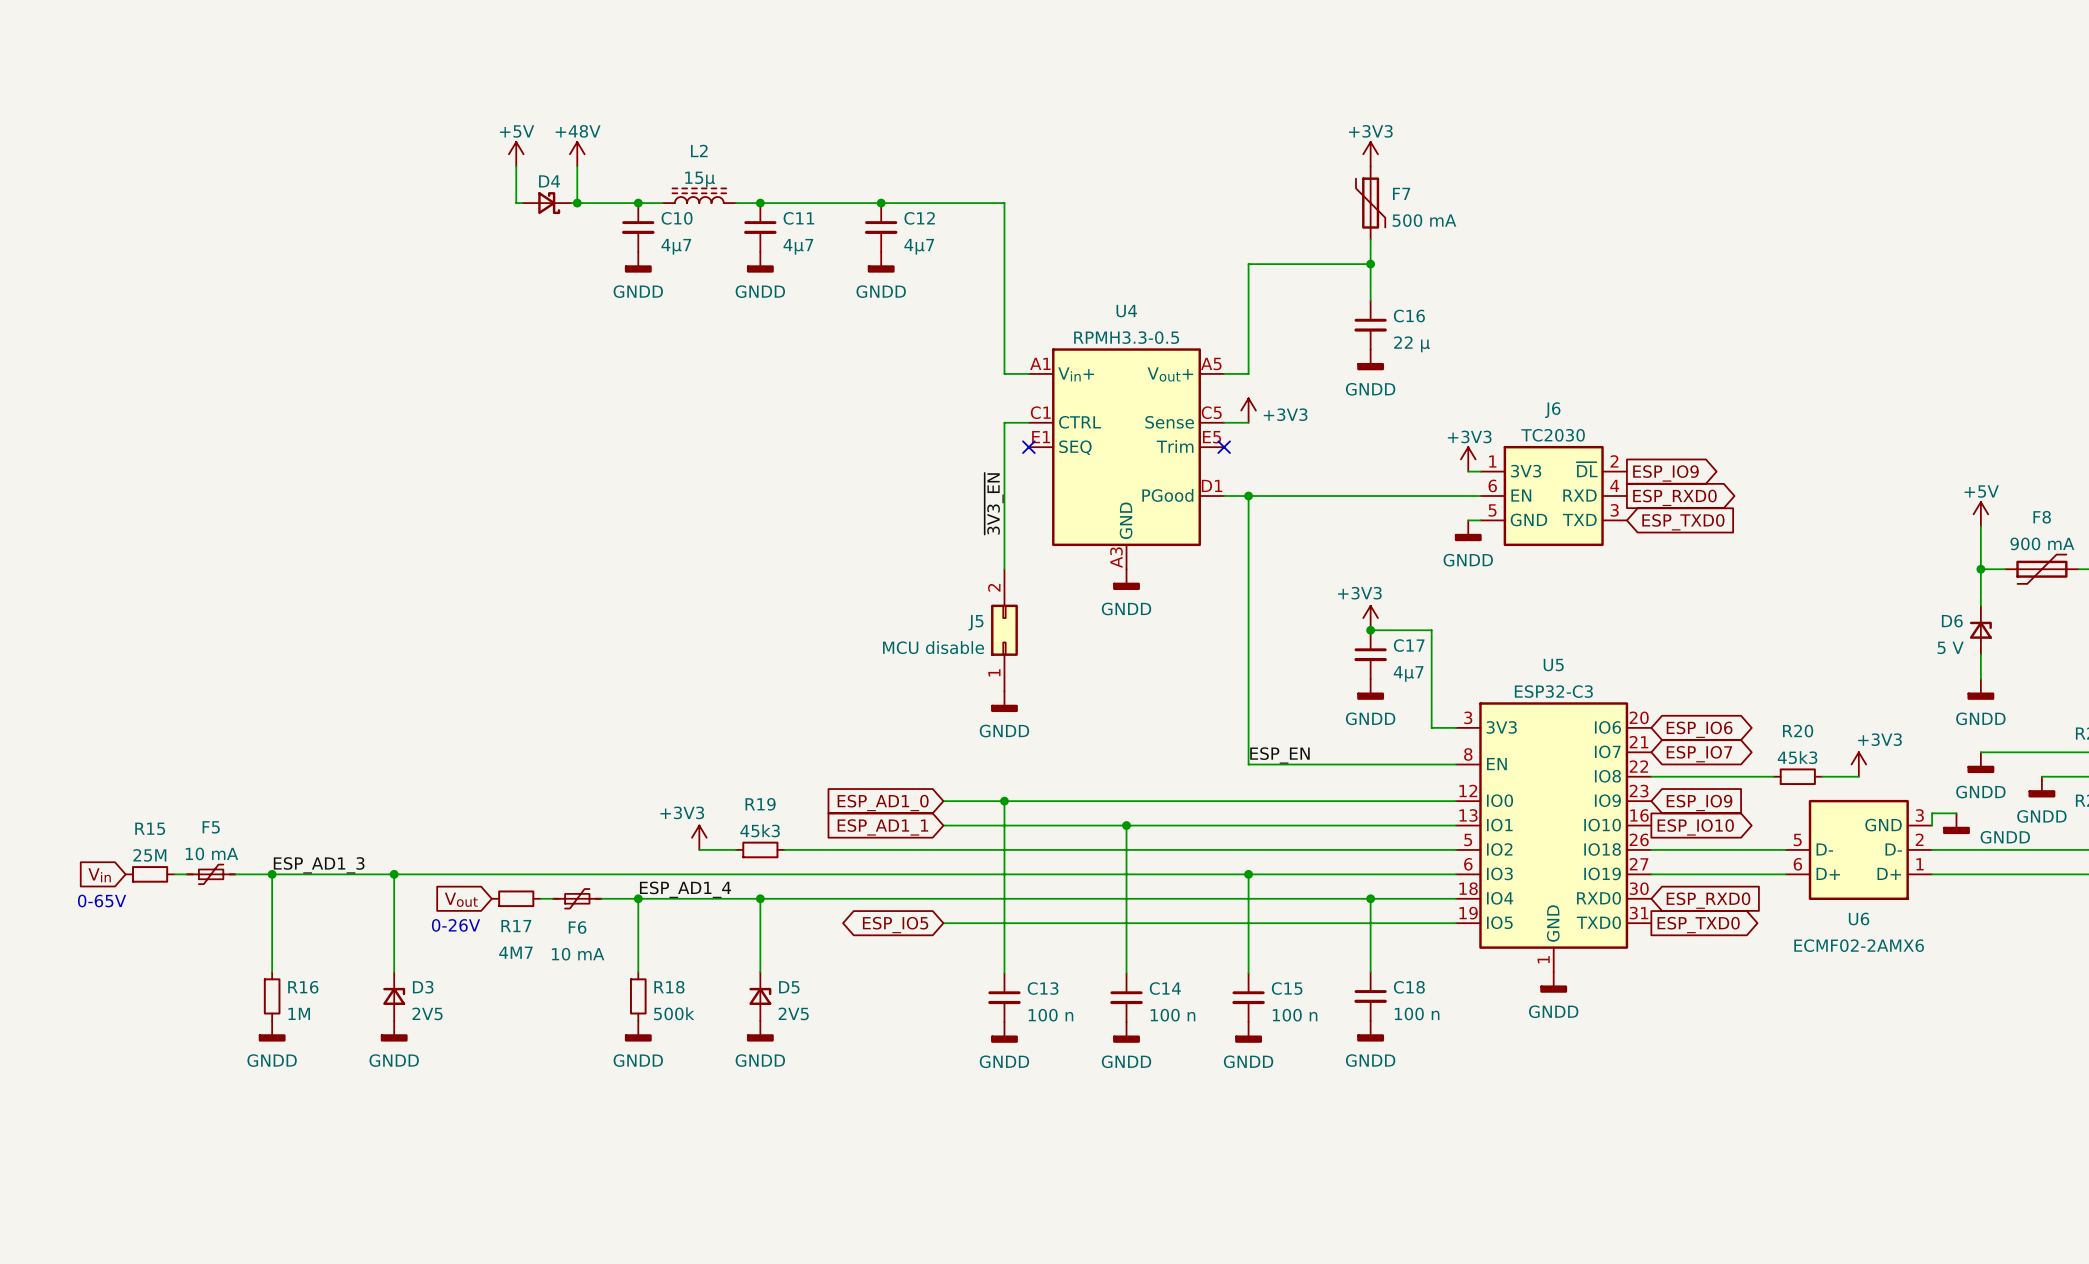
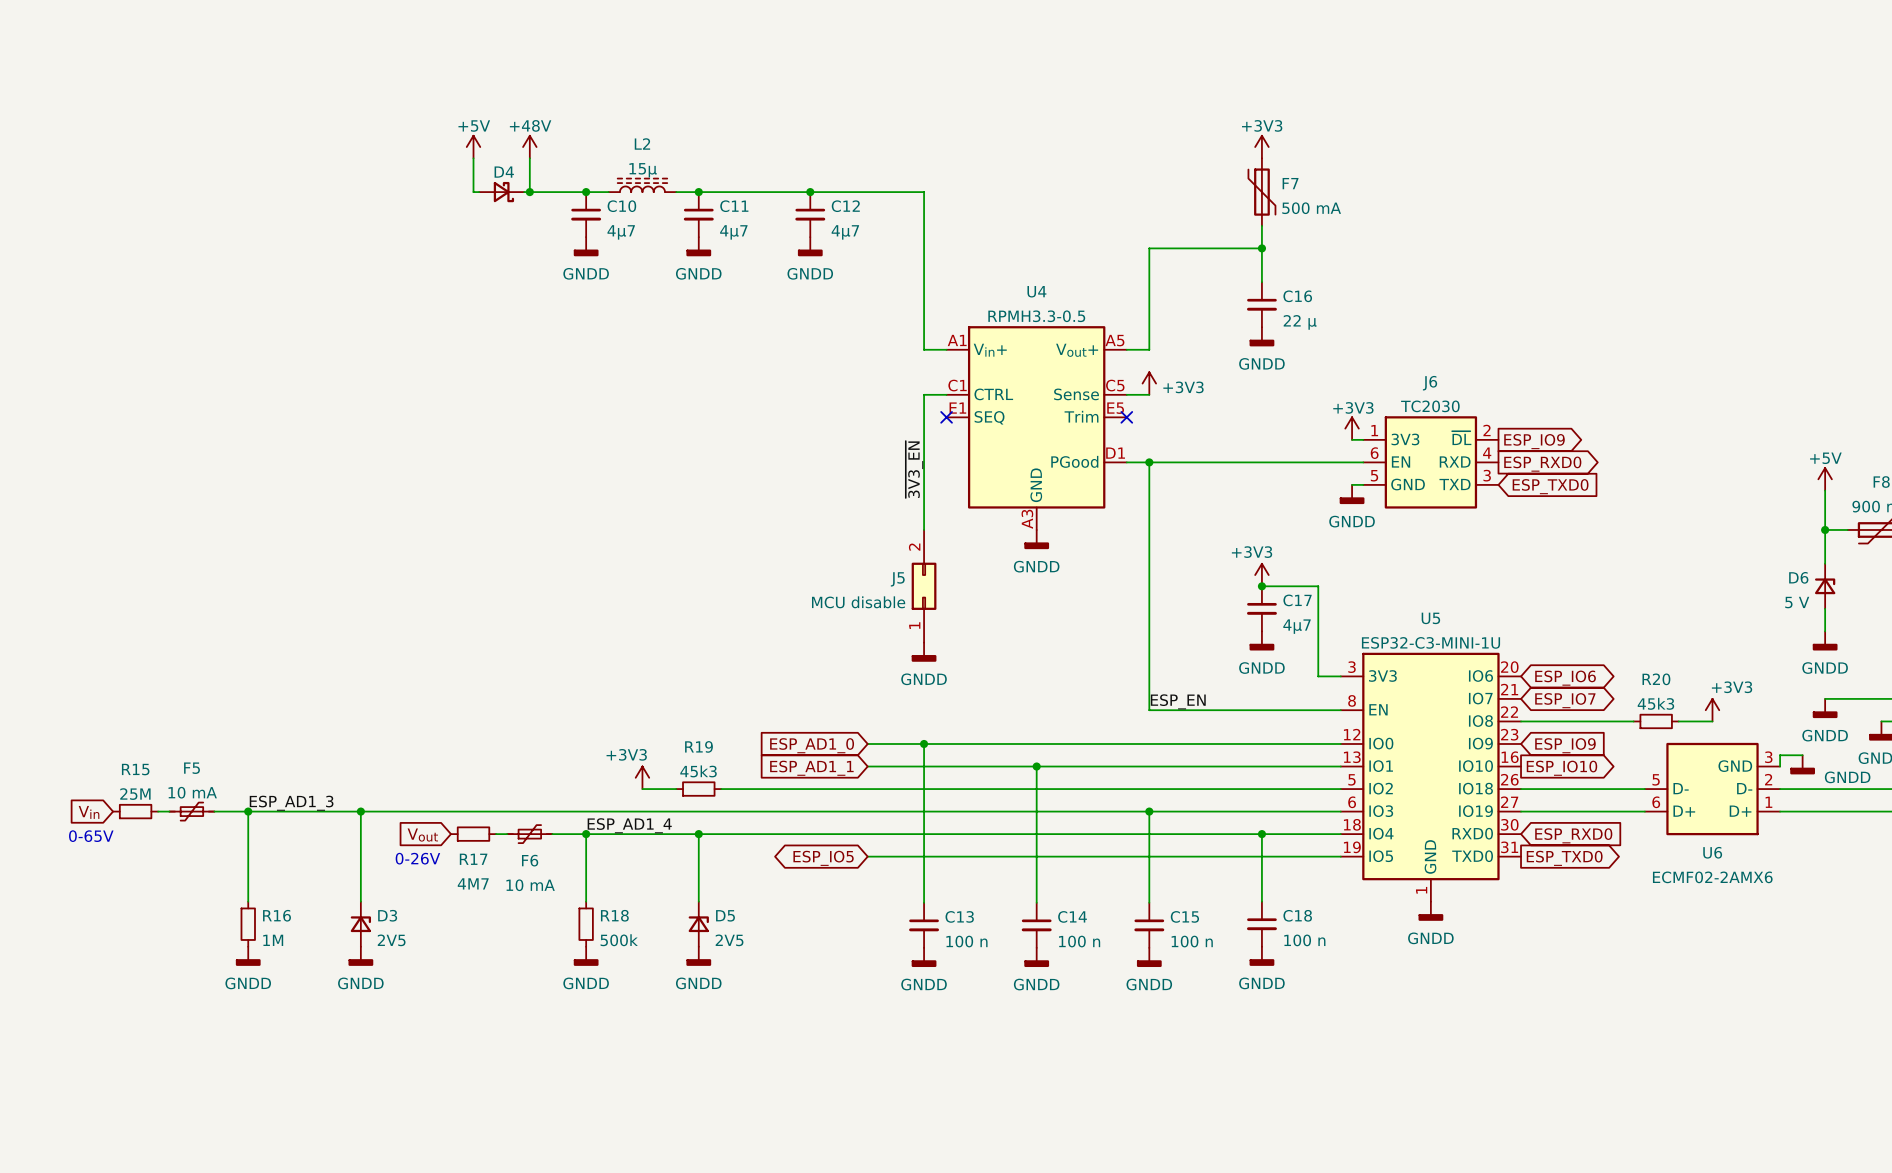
U5 value: ESP32-C3 (1553, 691) -> ESP32-C3-MINI-1U (1430, 642)

